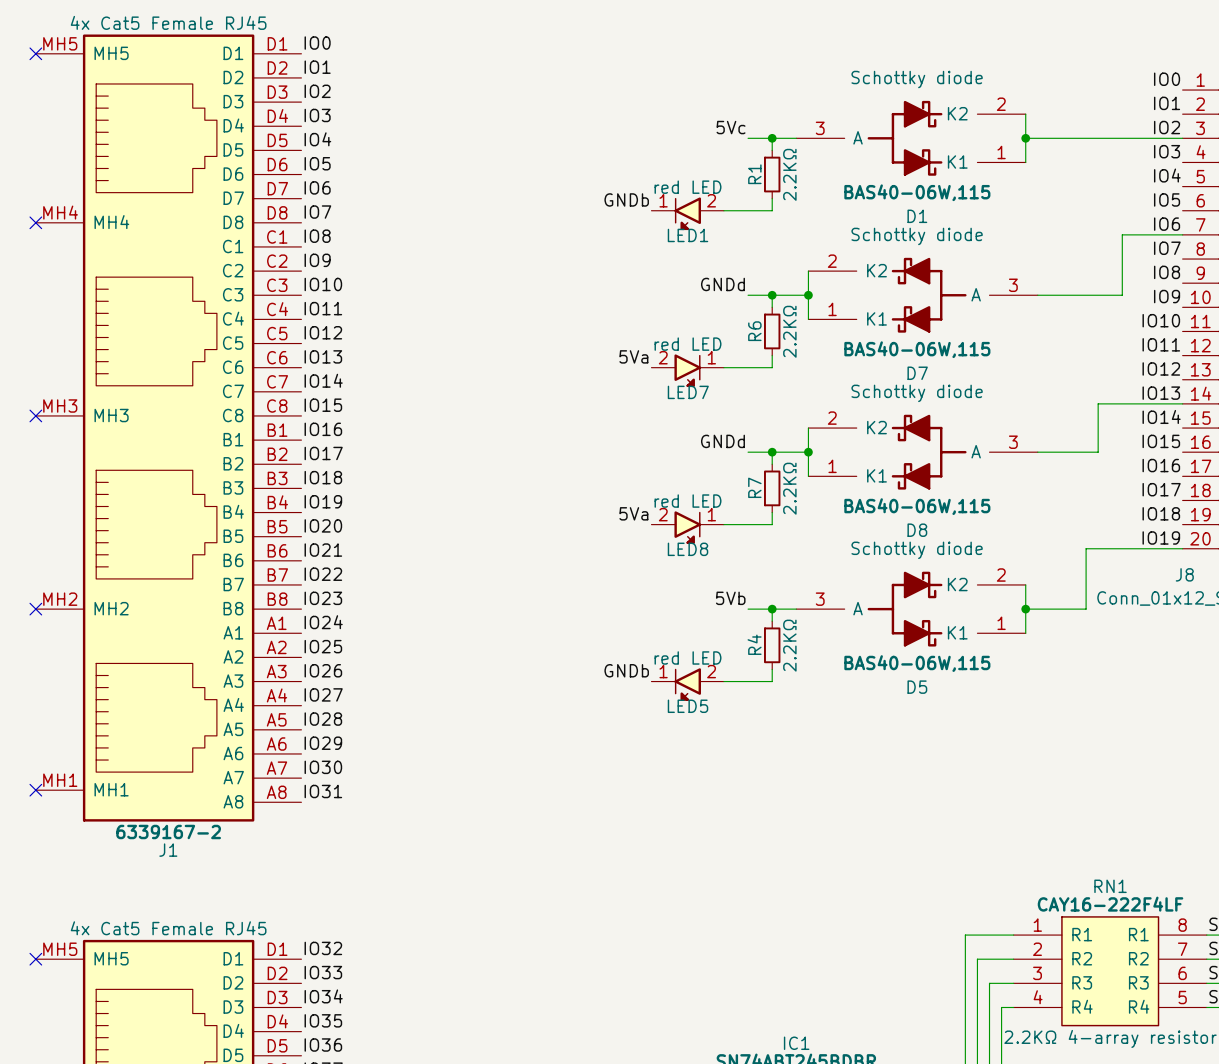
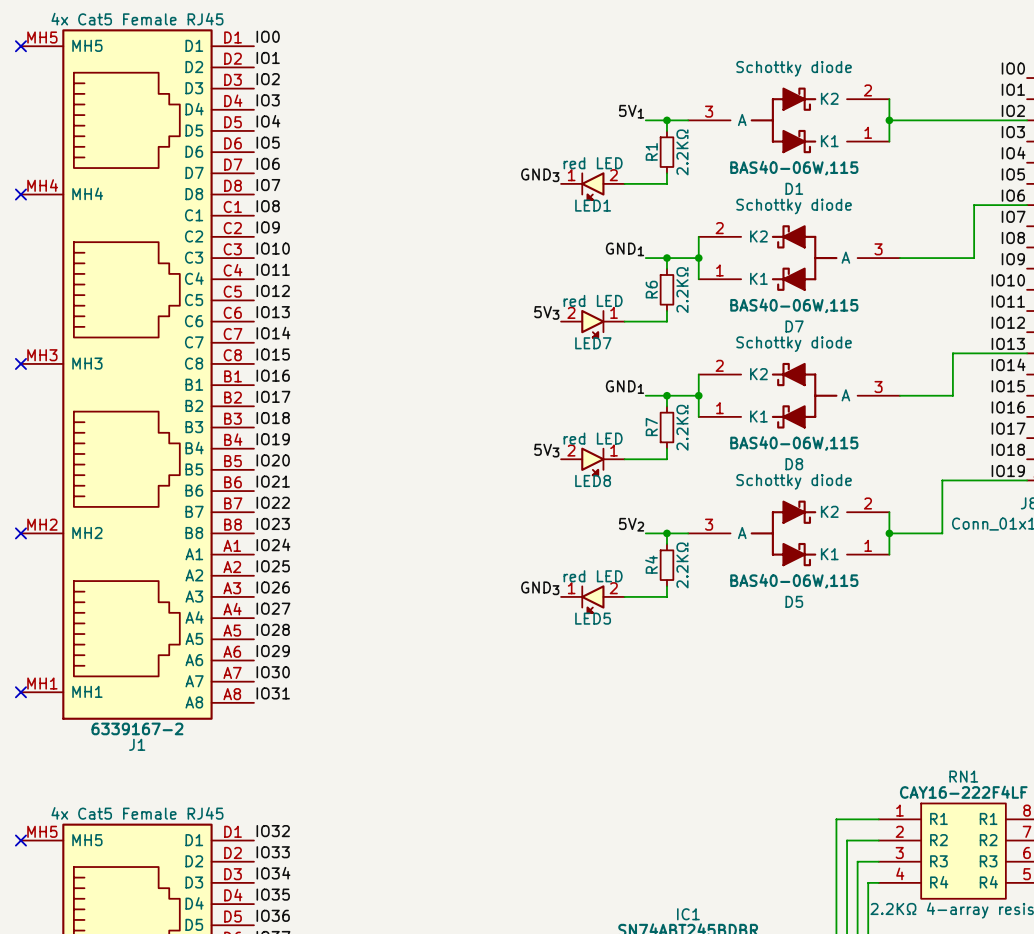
label: 5Vc (731, 127) -> 5V1 (631, 111)
label: GNDb (626, 199) -> GND3 (540, 175)
label: GNDd (722, 284) -> GND1 (624, 249)
label: 5Va (633, 356) -> 5V3 (546, 312)
label: GNDd (722, 441) -> GND1 (624, 387)
label: 5Va (633, 513) -> 5V3 (546, 450)
label: 5Vb (730, 598) -> 5V2 (631, 524)
label: GNDb (626, 670) -> GND3 (540, 588)

